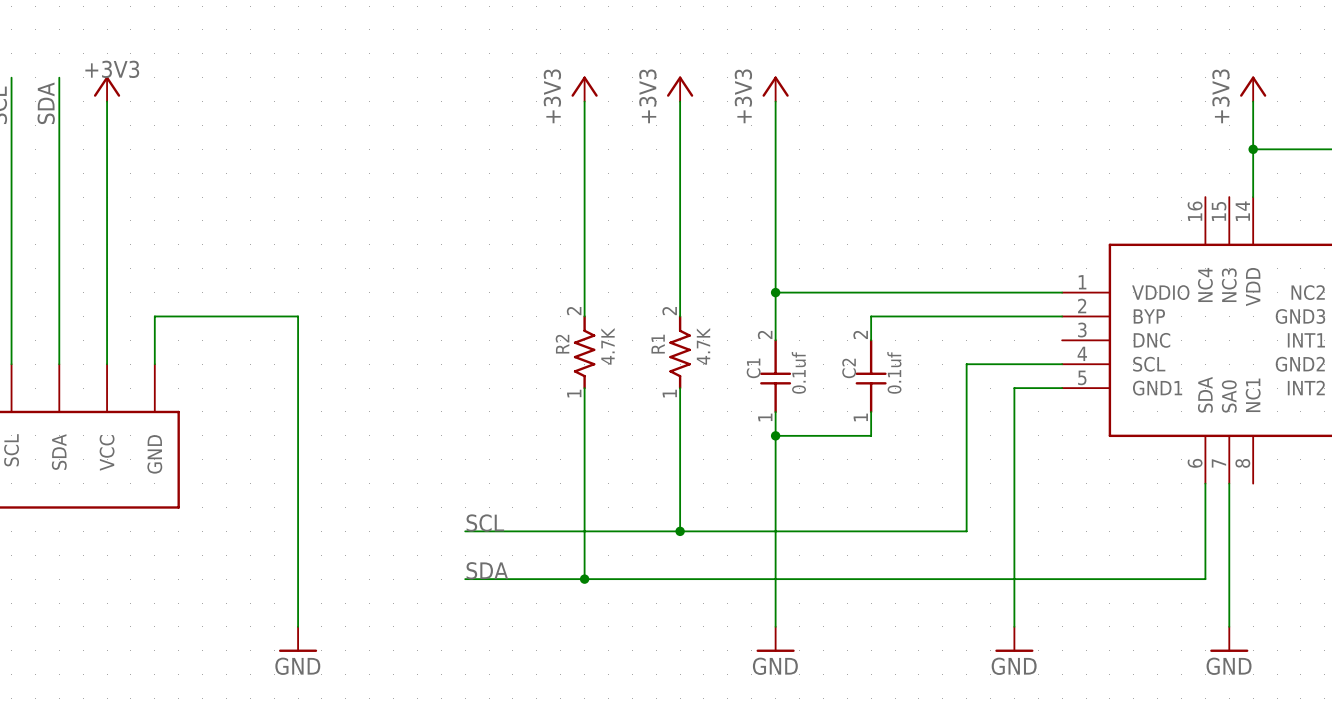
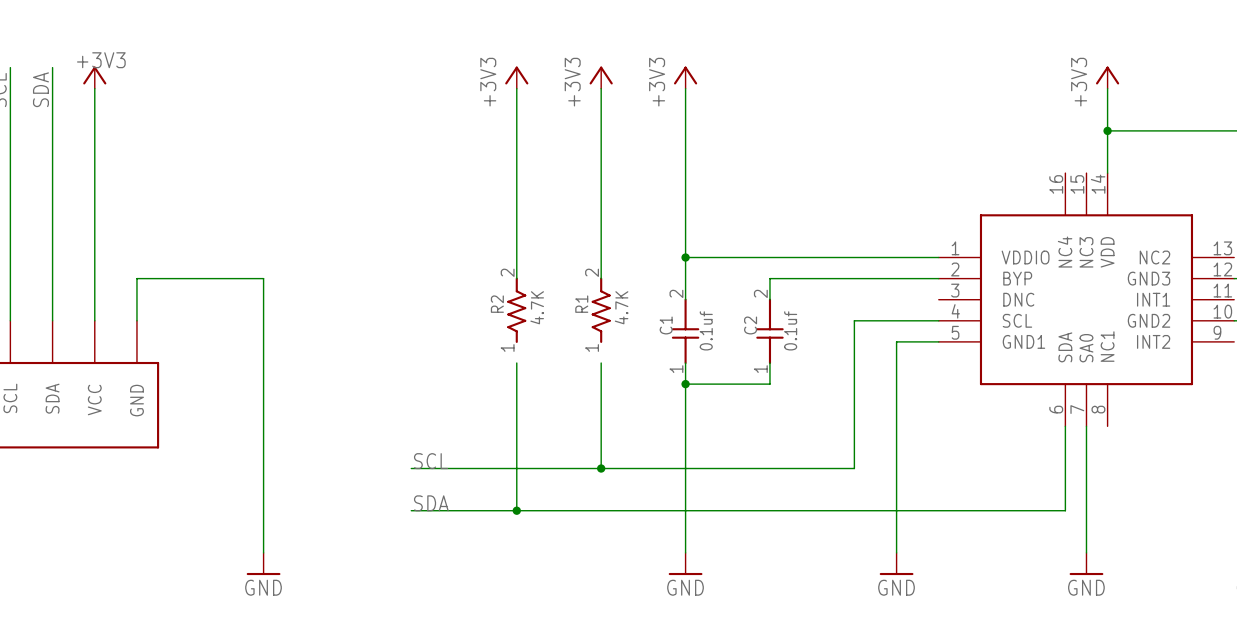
wire: (584, 388) (584, 411) -> none
wire: (680, 388) (680, 411) -> none

